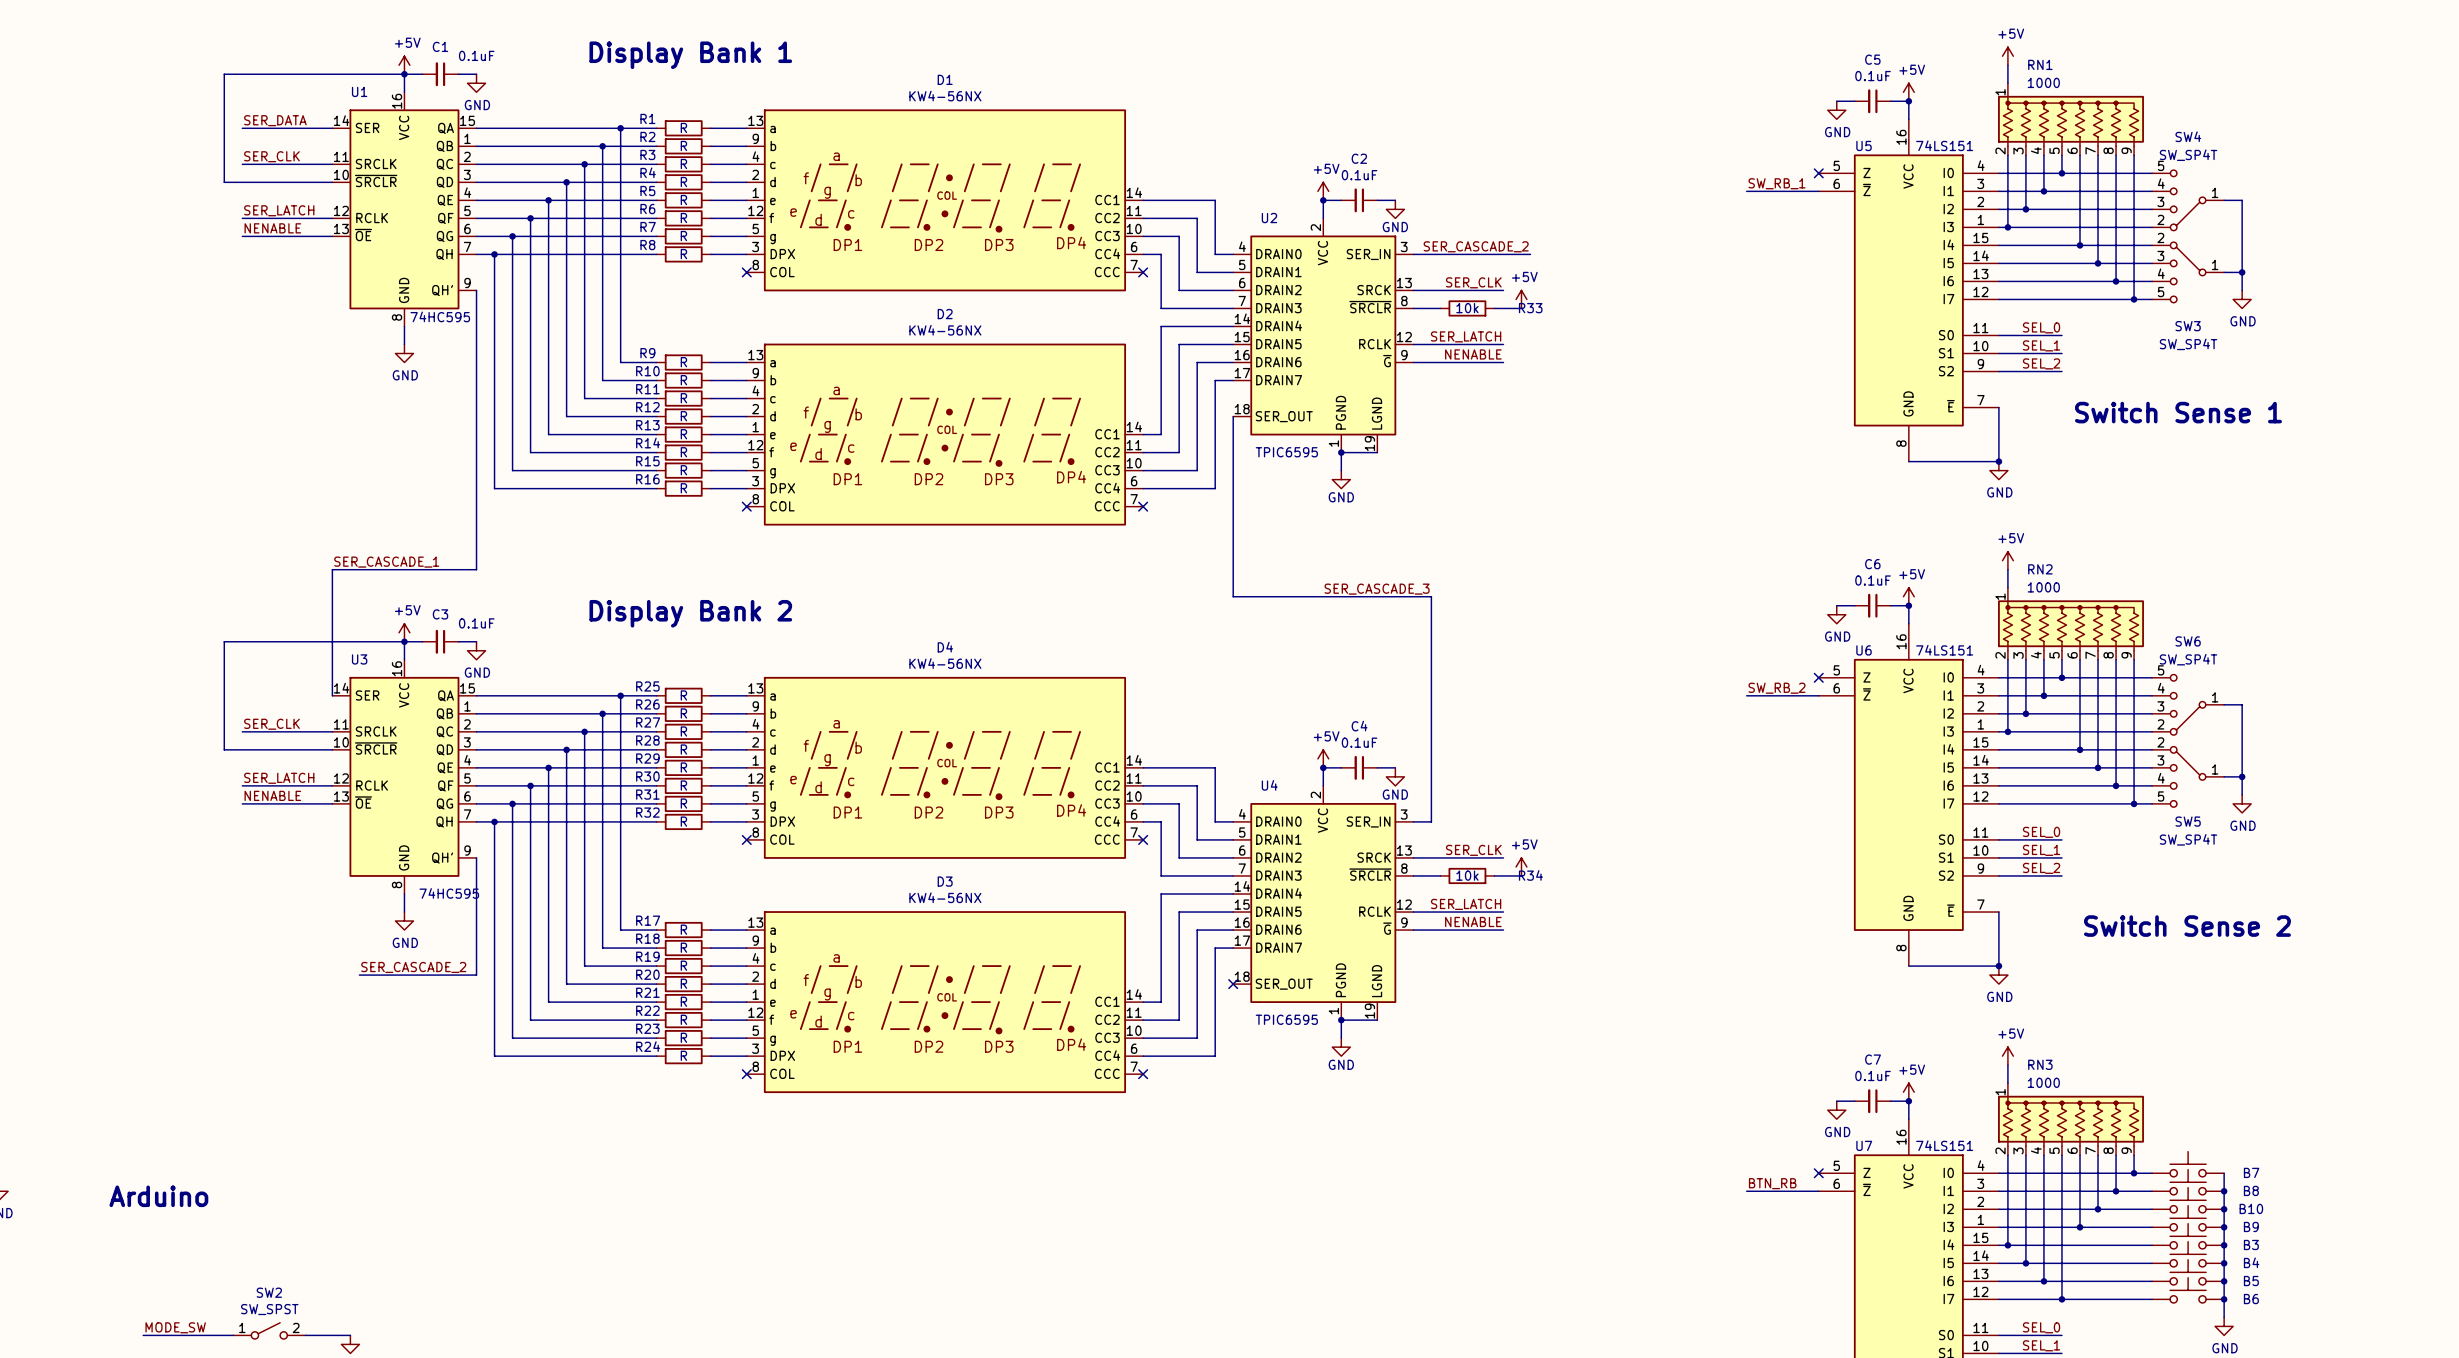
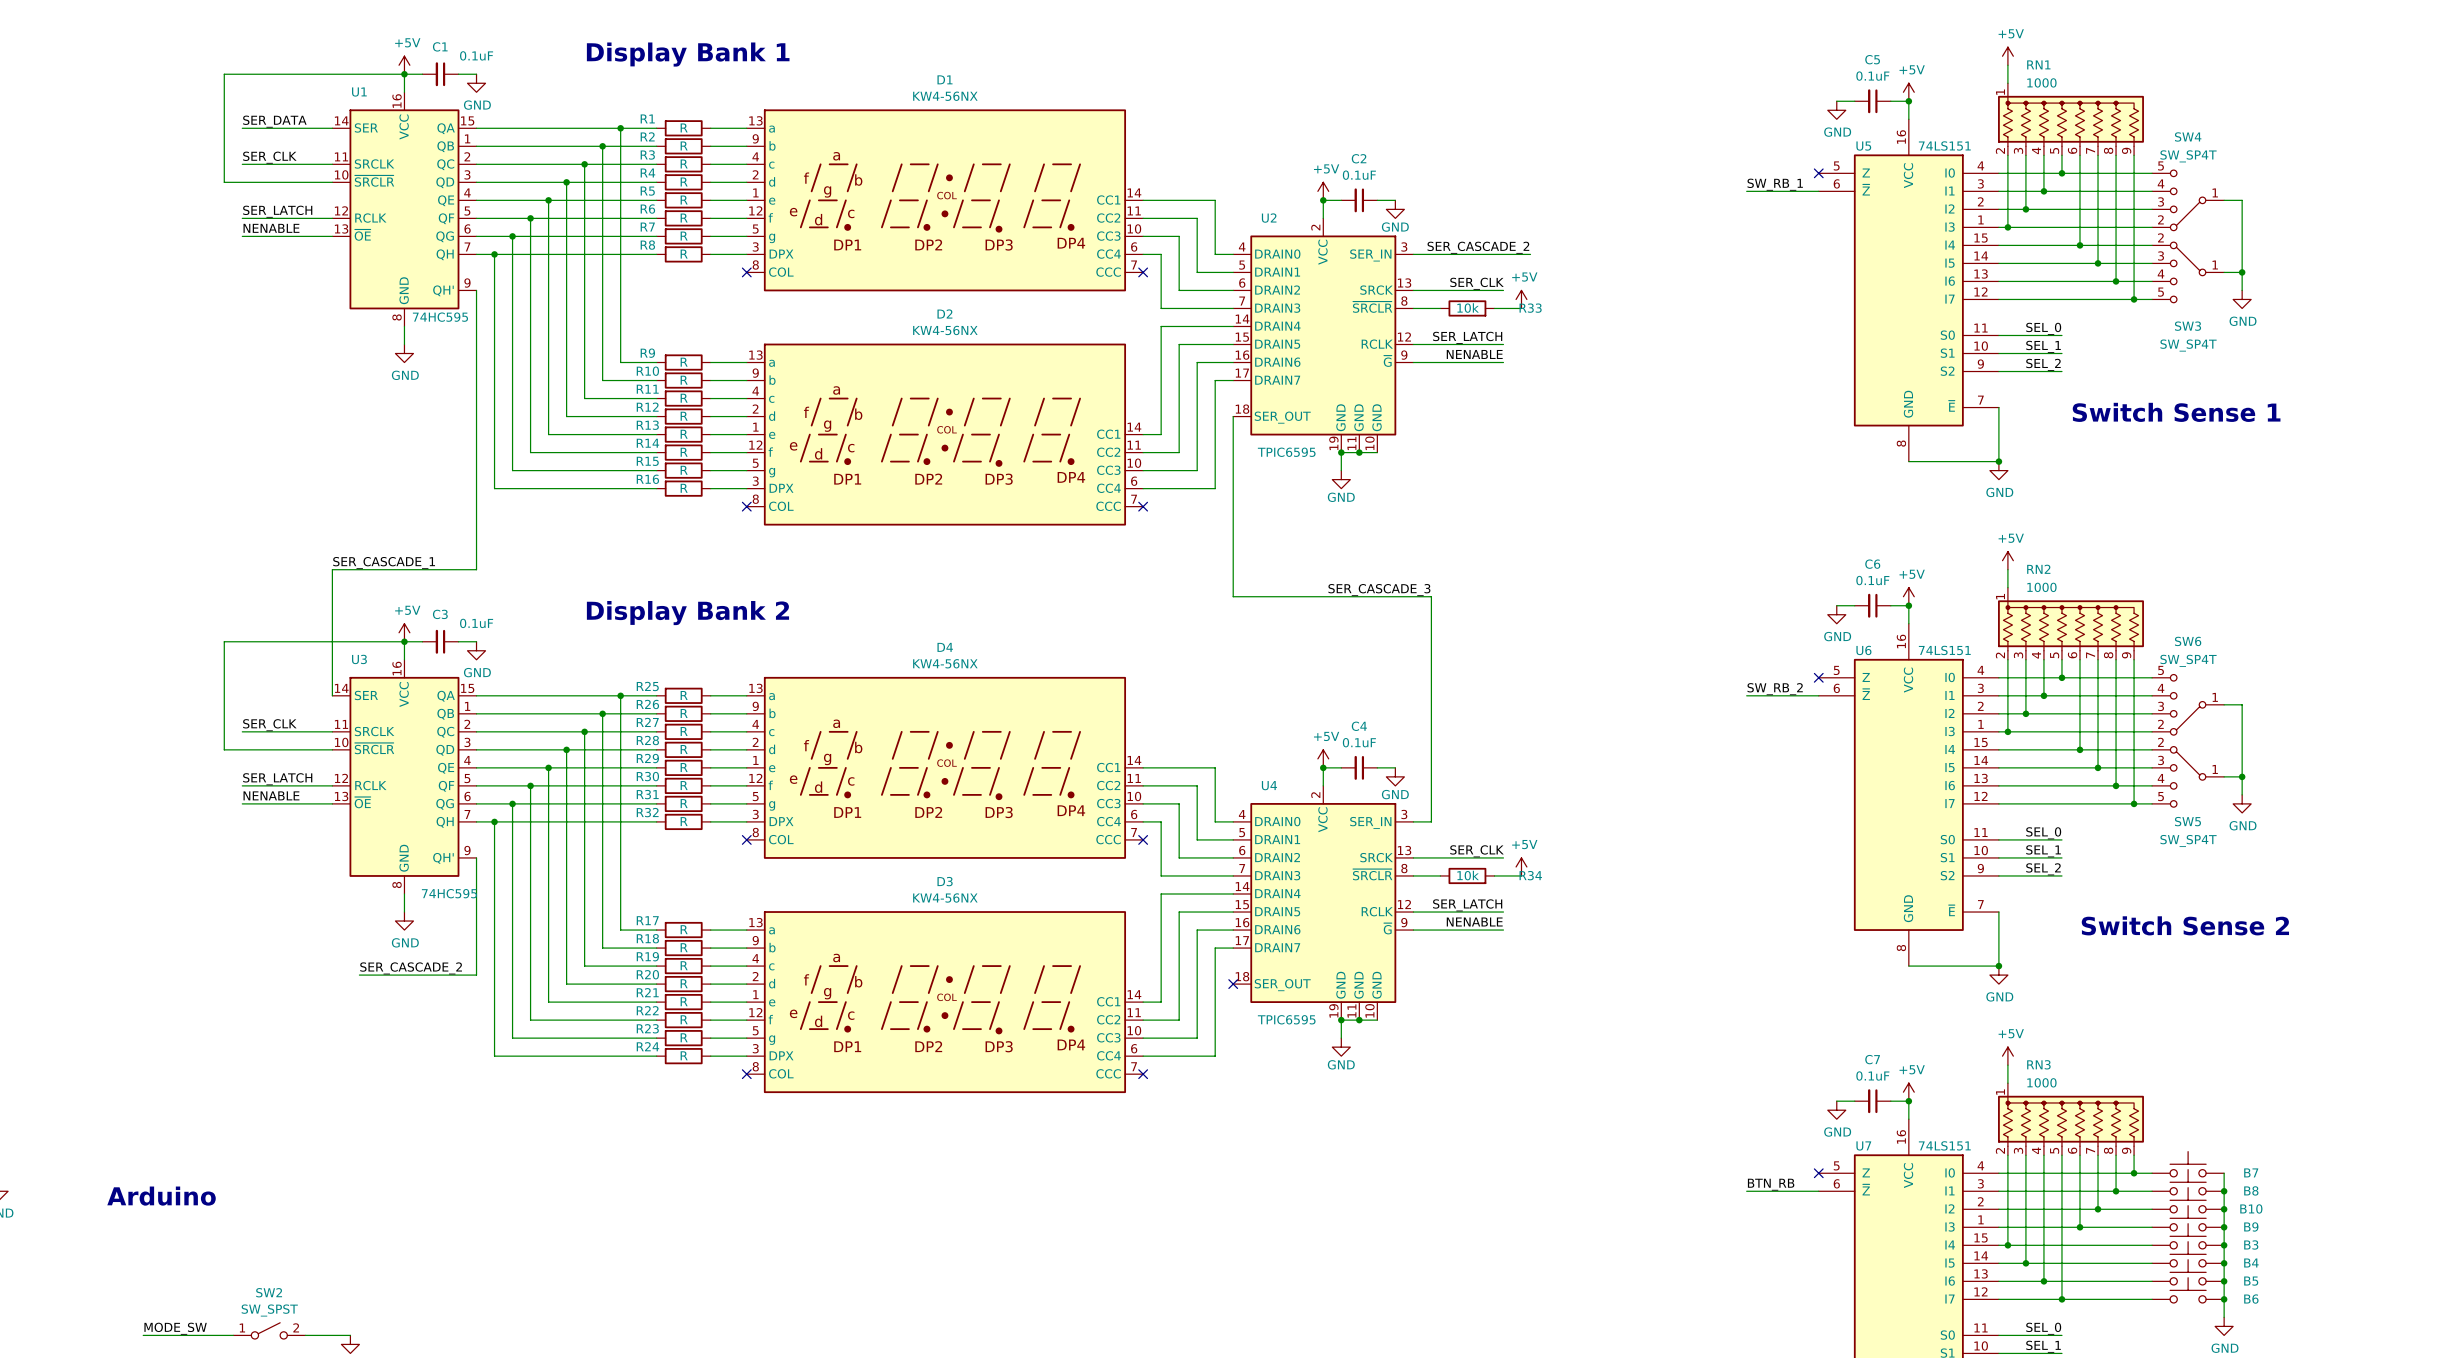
U2 symbol: [1233, 218, 1414, 453] -> [1233, 218, 1414, 453]
junction: none -> (1359, 452)
U4 symbol: [1233, 785, 1414, 1021] -> [1233, 785, 1414, 1021]
junction: none -> (1359, 1020)

